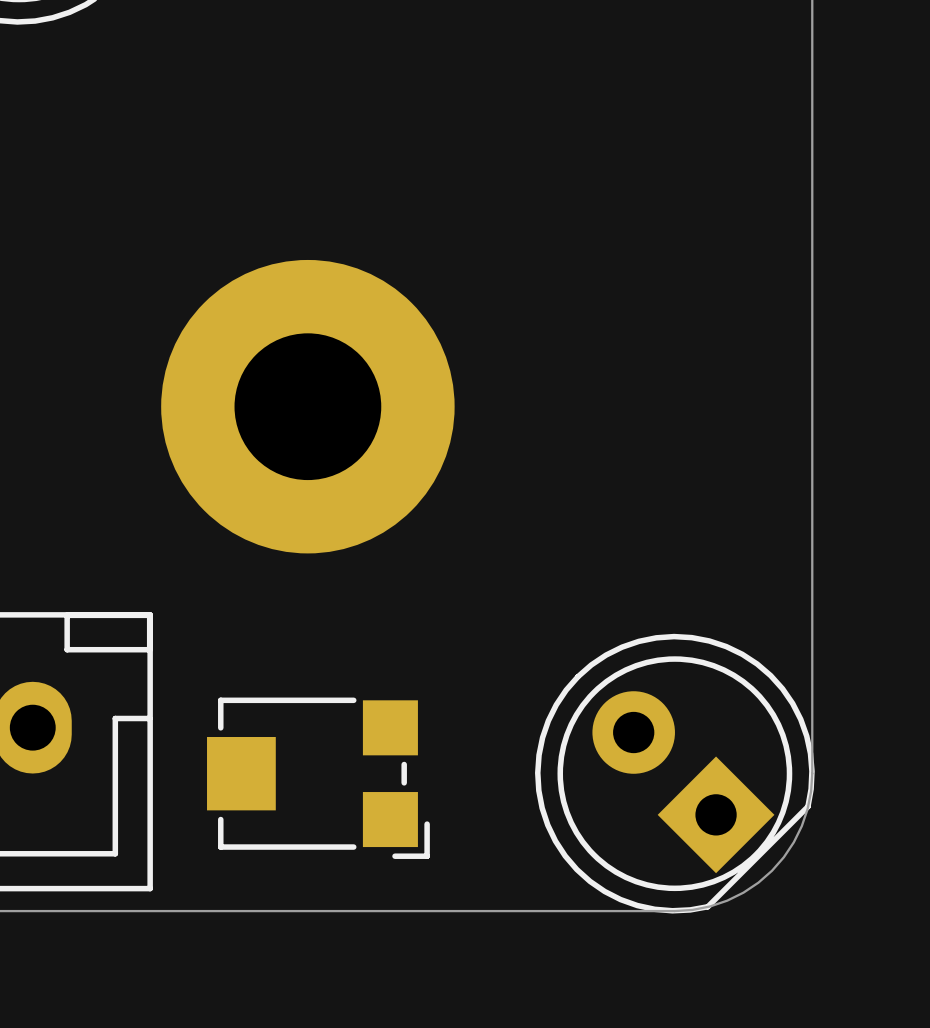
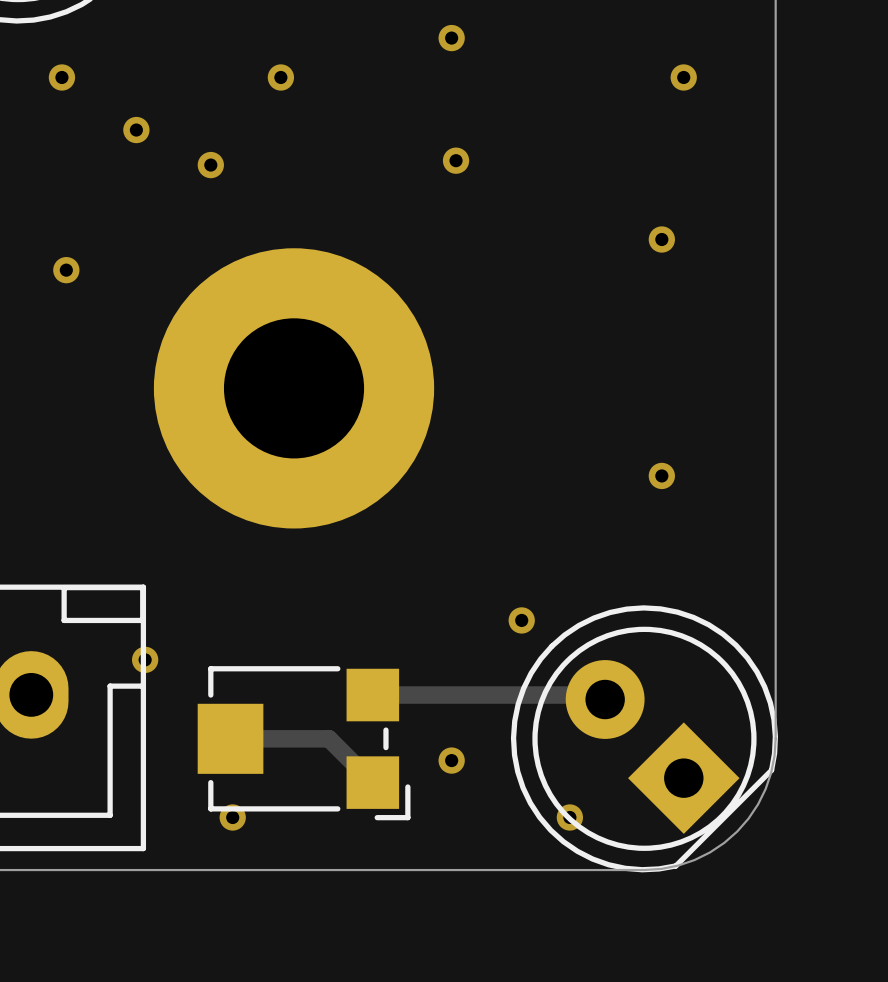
via: none -> (451, 38)
via: none -> (61, 77)
via: none -> (280, 77)
via: none -> (683, 77)
via: none -> (136, 130)
via: none -> (456, 160)
via: none -> (210, 165)
via: none -> (661, 239)
via: none -> (66, 270)
via: none -> (661, 475)
via: none -> (521, 620)
via: none -> (145, 659)
track: none -> (372, 695) (600, 695) (605, 699)
track: none -> (230, 738) (329, 738) (372, 782)
via: none -> (451, 760)
via: none -> (232, 817)
via: none -> (569, 817)

